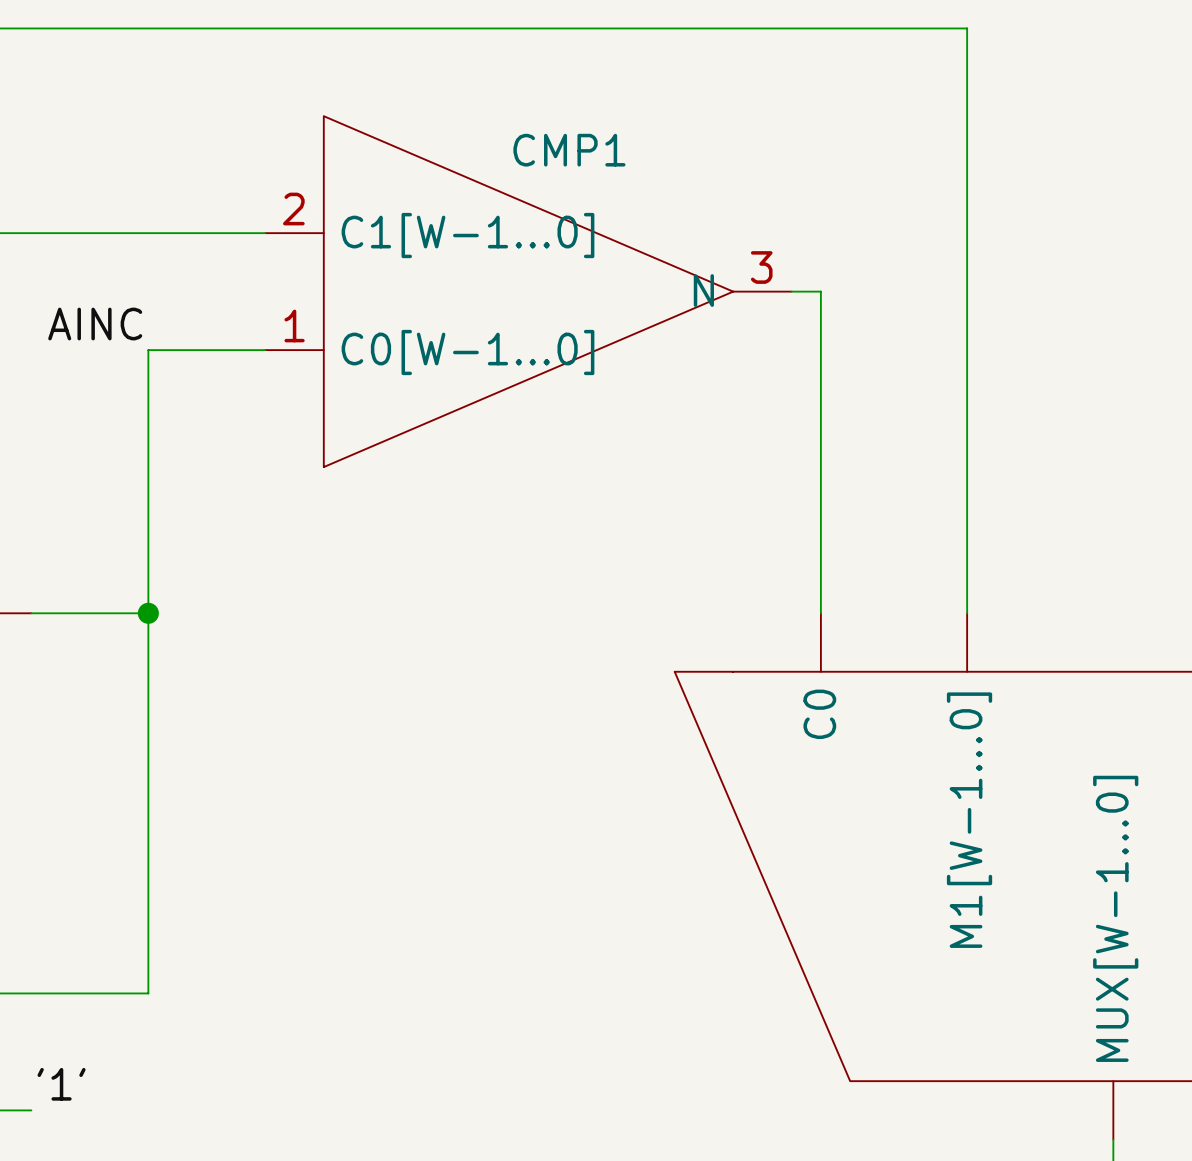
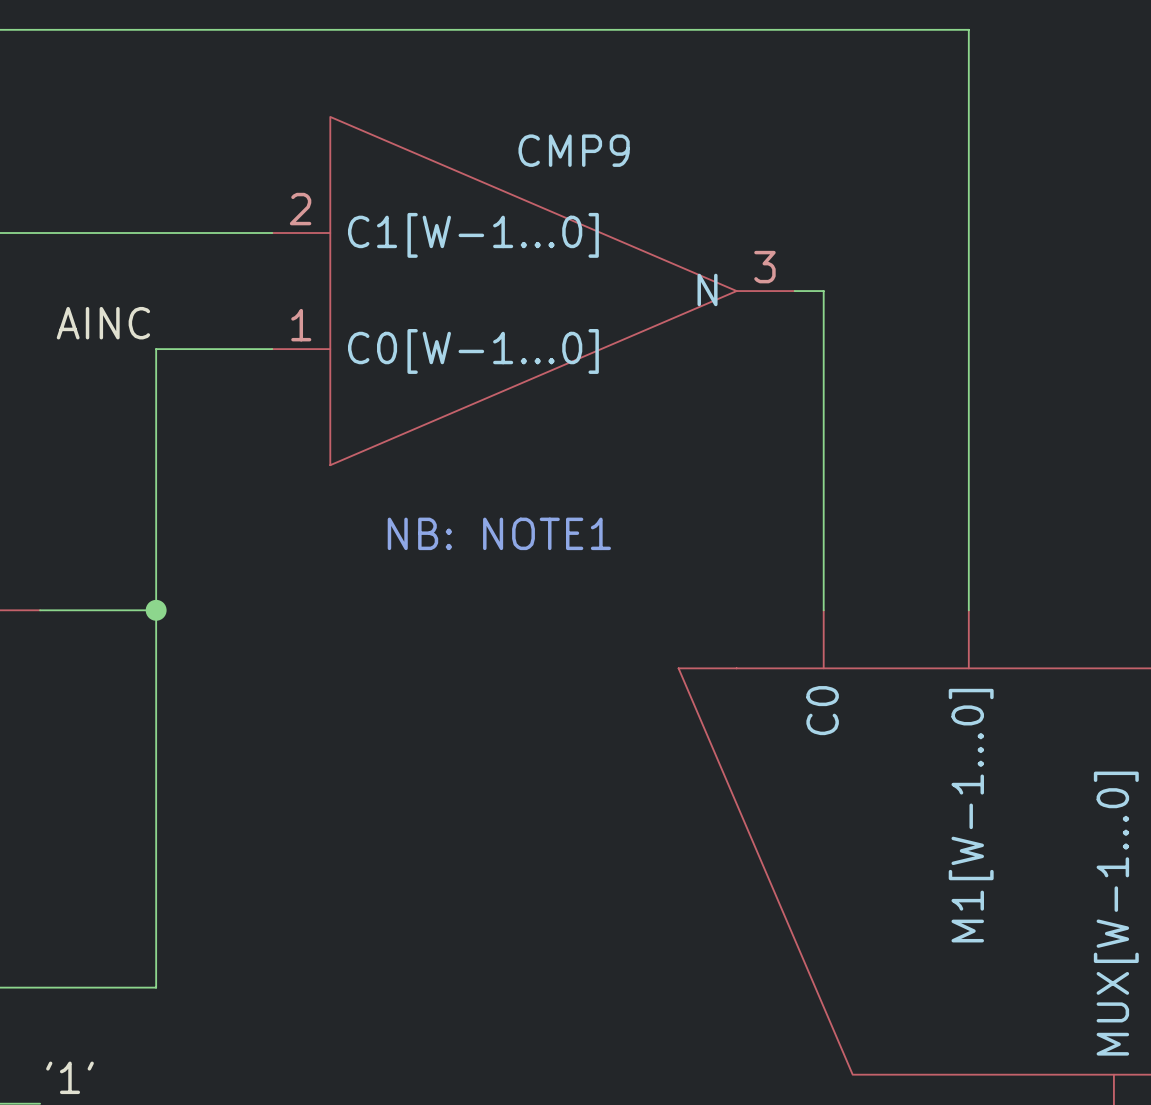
CMP1 name: CMP1 (569, 150) -> CMP9 (574, 150)
text: none -> NB: NOTE1 (499, 533)

